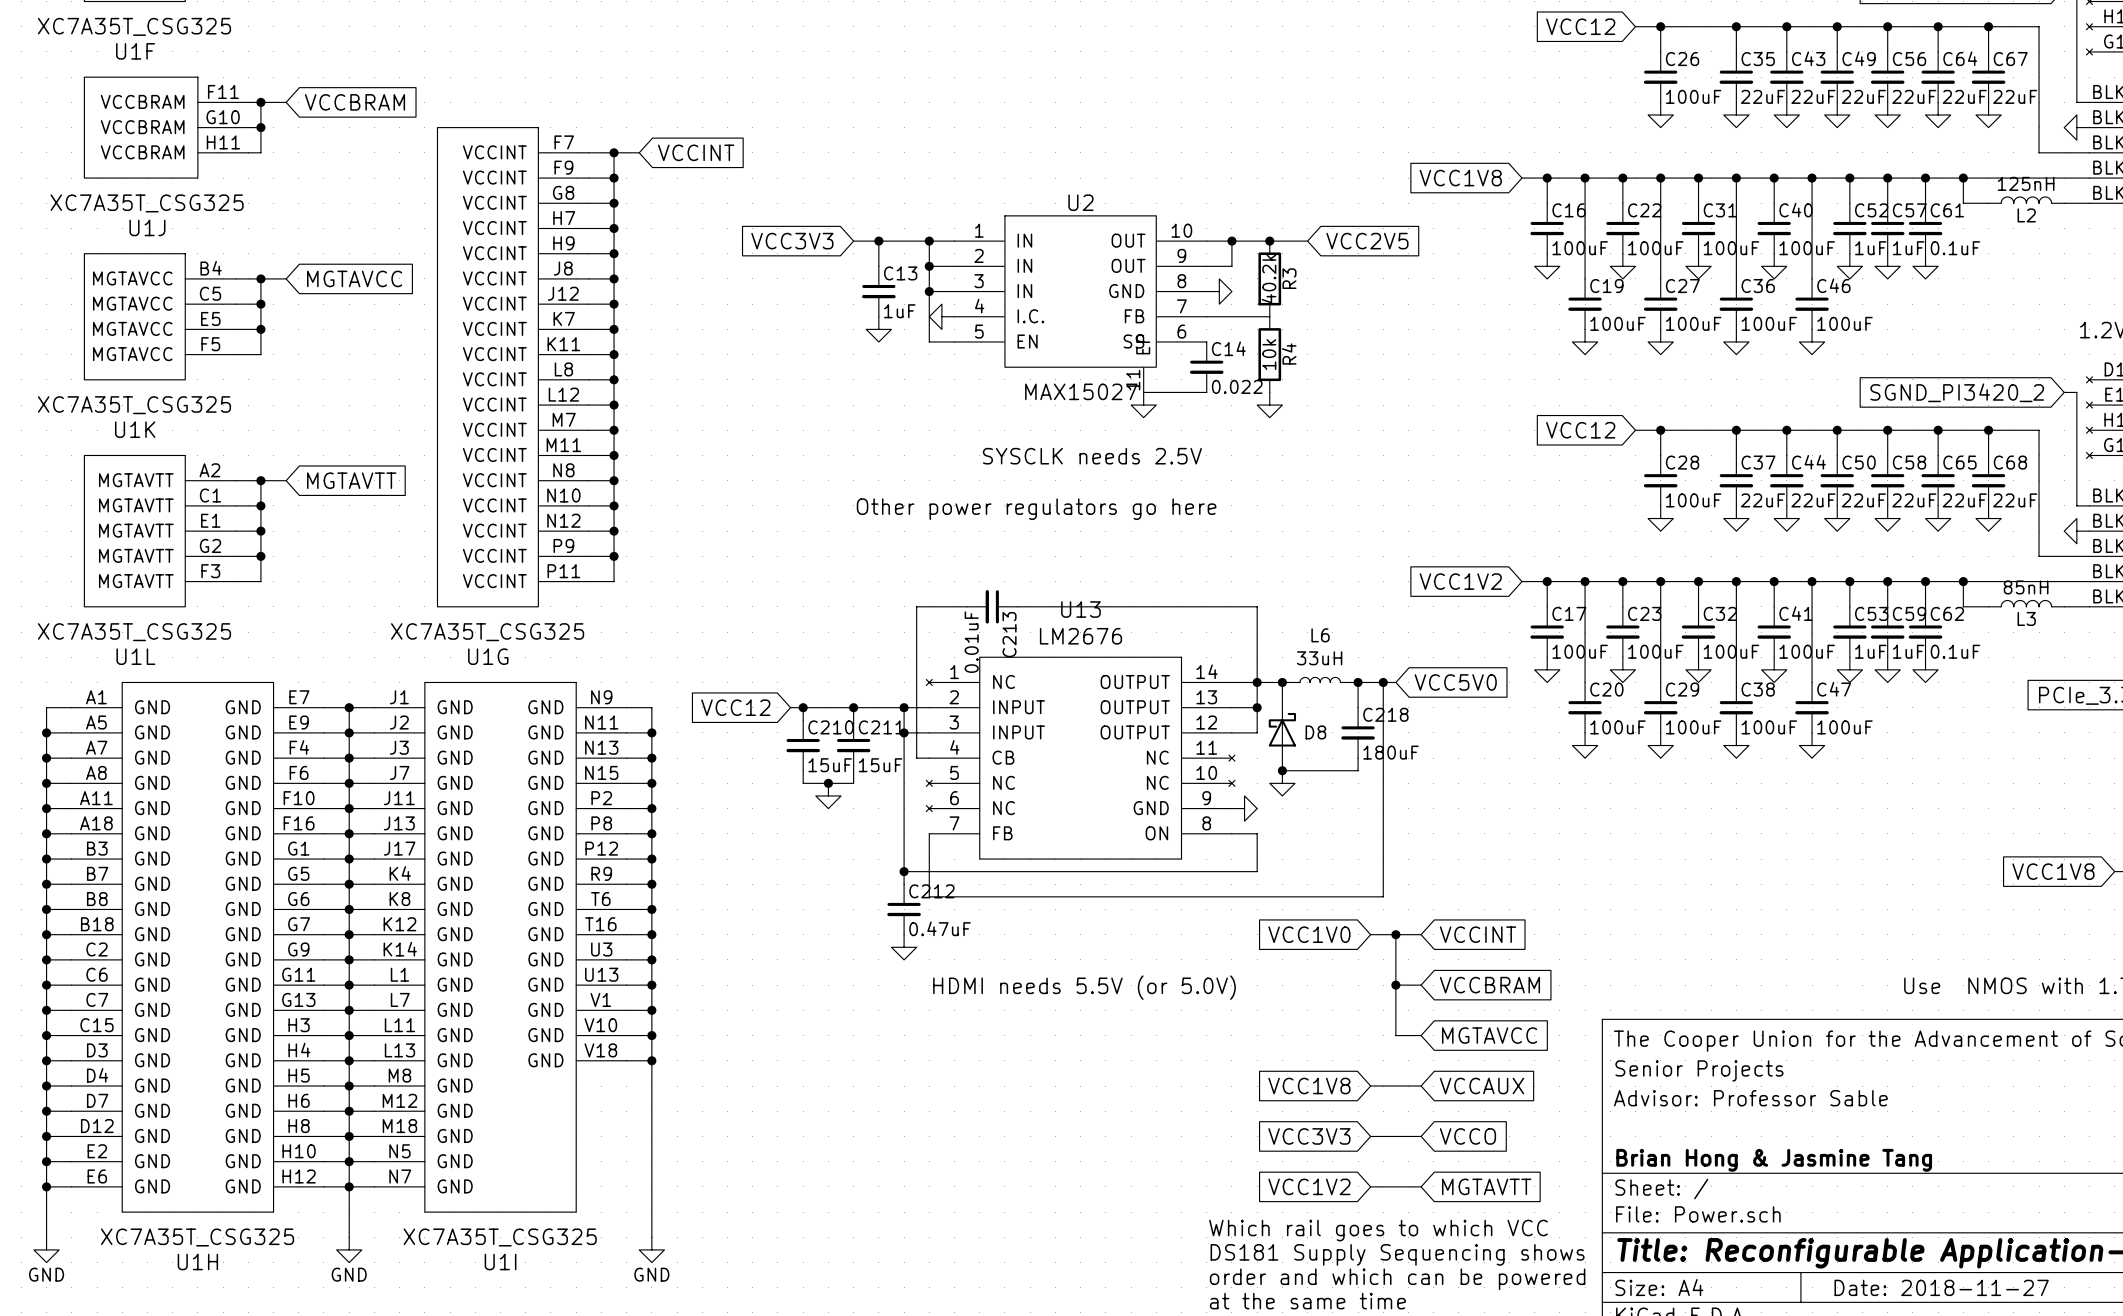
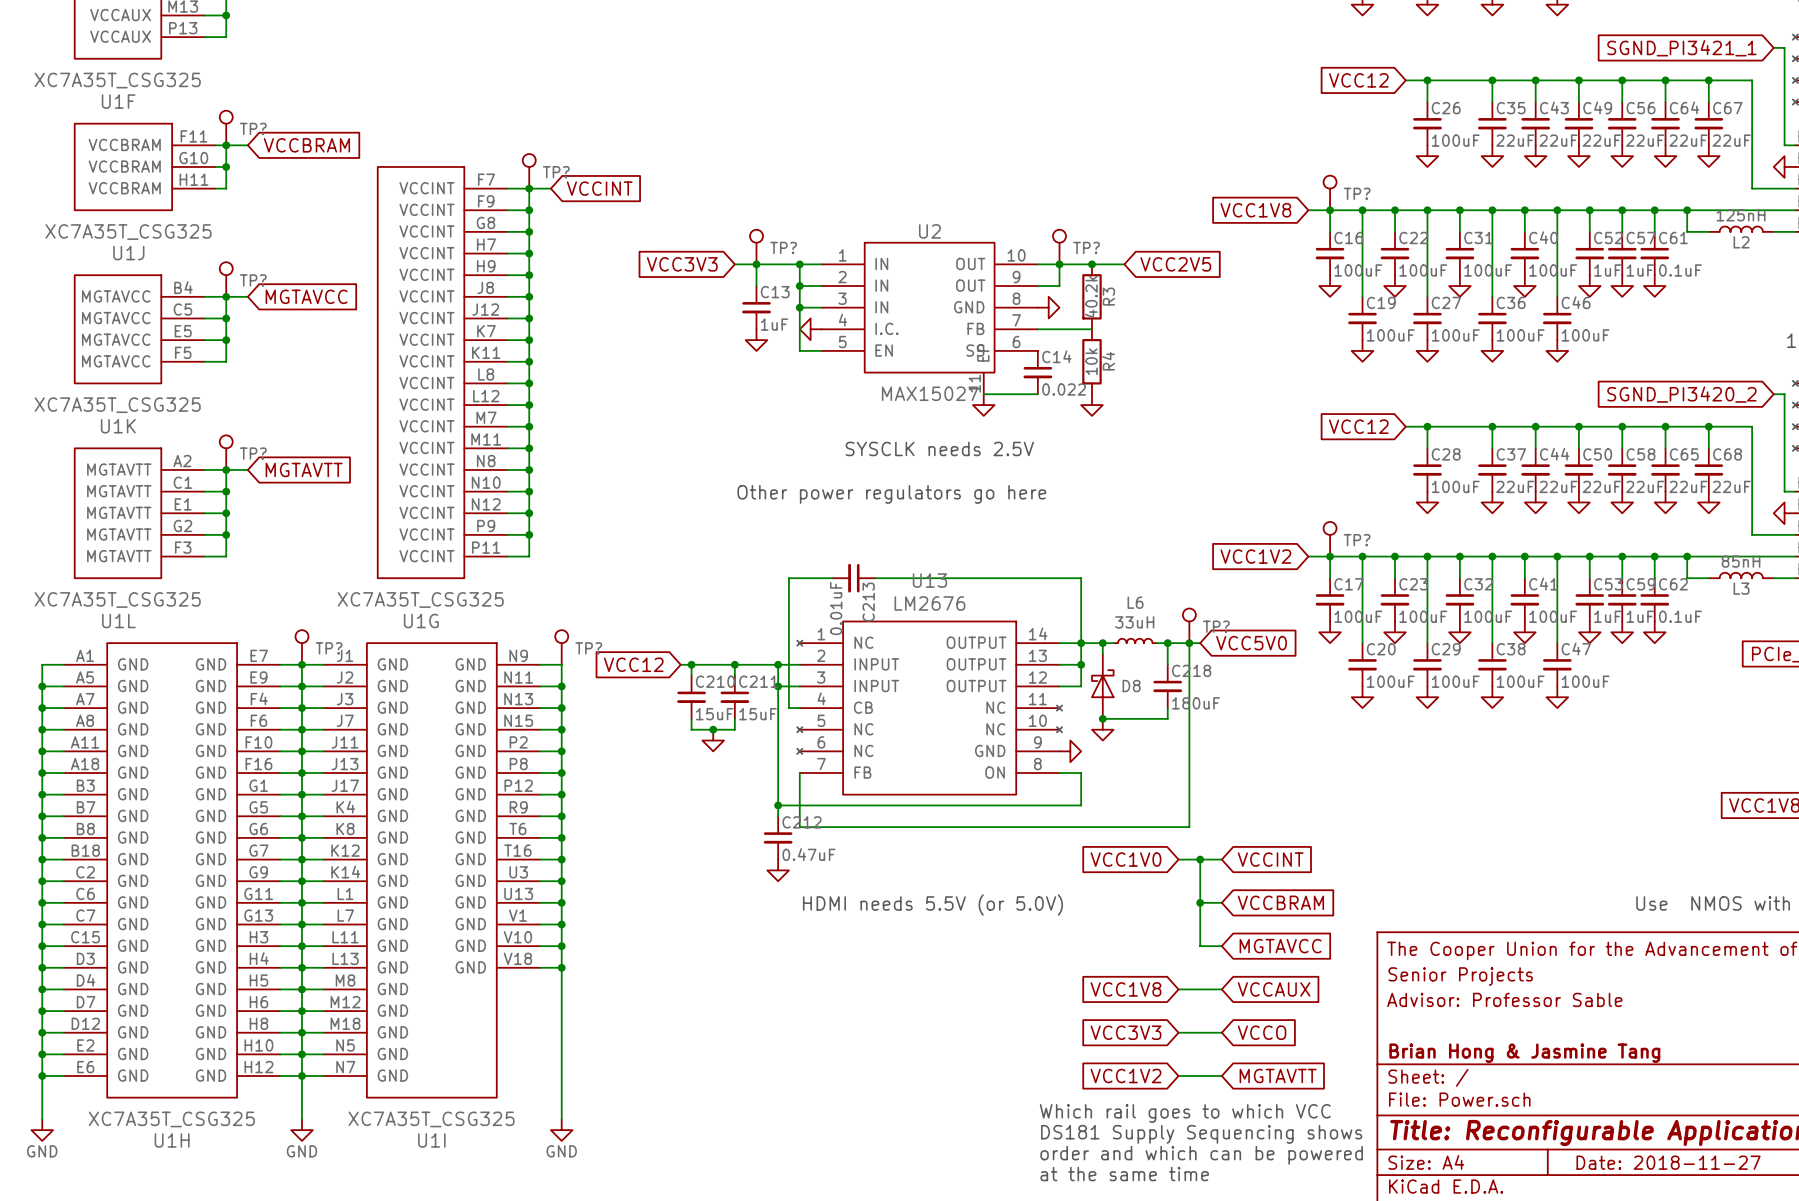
TP?: none -> (226, 128)
TP?: none -> (529, 171)
TP?: none -> (1330, 192)
TP?: none -> (756, 247)
TP?: none -> (1059, 247)
TP?: none -> (226, 279)
TP?: none -> (226, 452)
TP?: none -> (1330, 539)
TP?: none -> (1189, 625)
TP?: none -> (301, 647)
TP?: none -> (561, 647)

